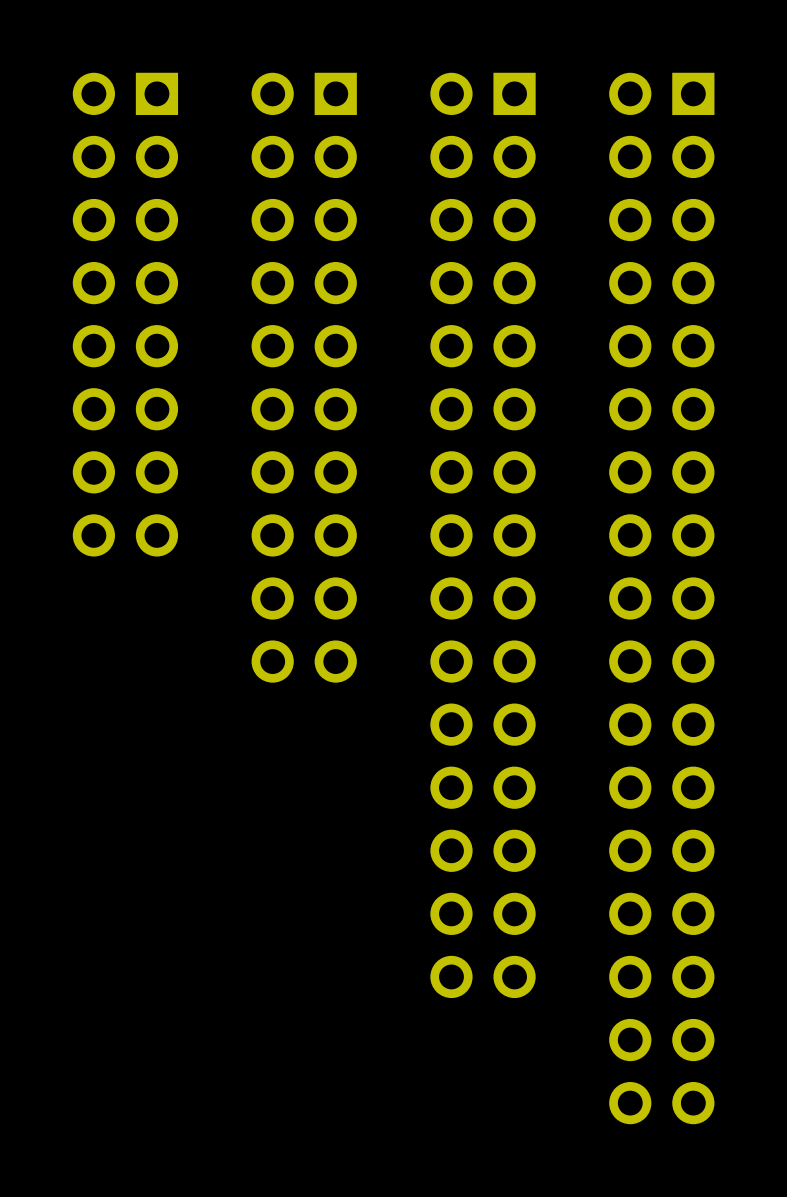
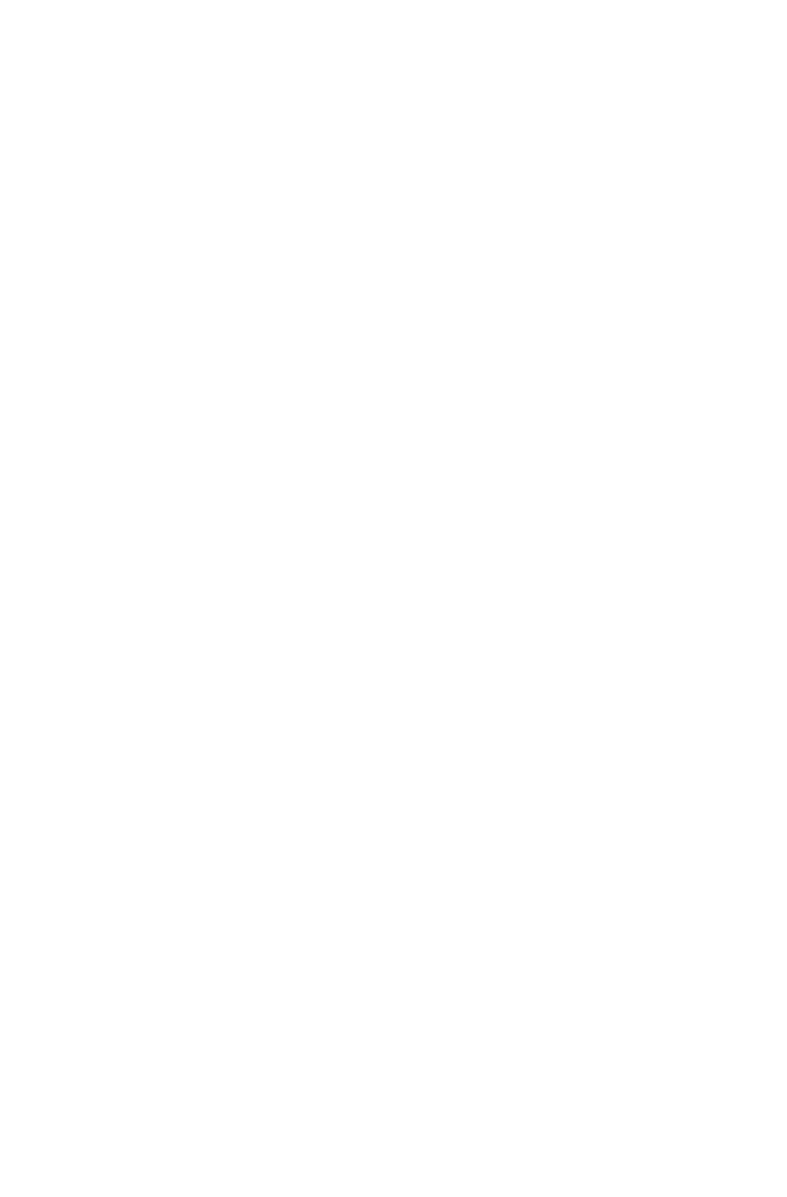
part: (125, 314) -> none
part: (304, 377) -> none
part: (483, 535) -> none
part: (661, 598) -> none

